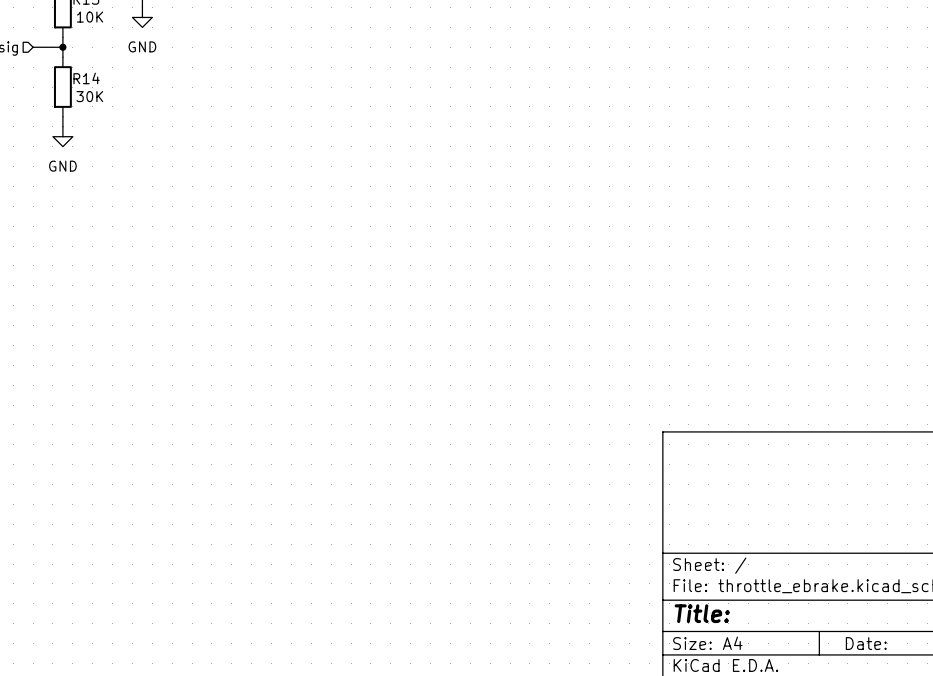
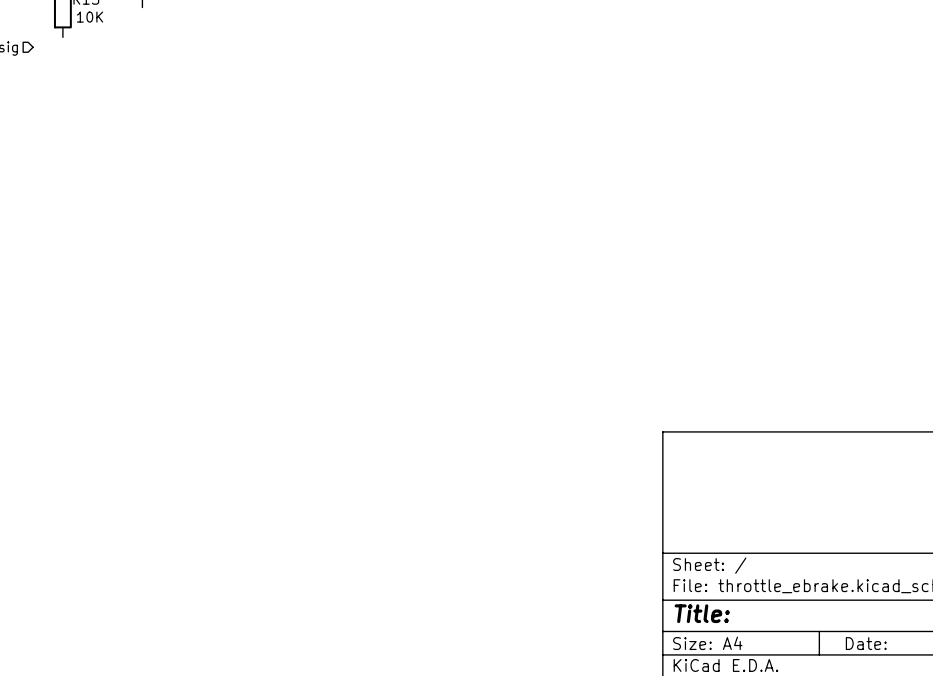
power symbol: GND (142, 17) -> none
wire: (62, 37) (62, 57) -> none
wire: (33, 47) (62, 47) -> none
junction: (62, 47) -> none
R14: 30K (62, 87) -> none
wire: (62, 116) (62, 126) -> none
power symbol: GND (62, 136) -> none

